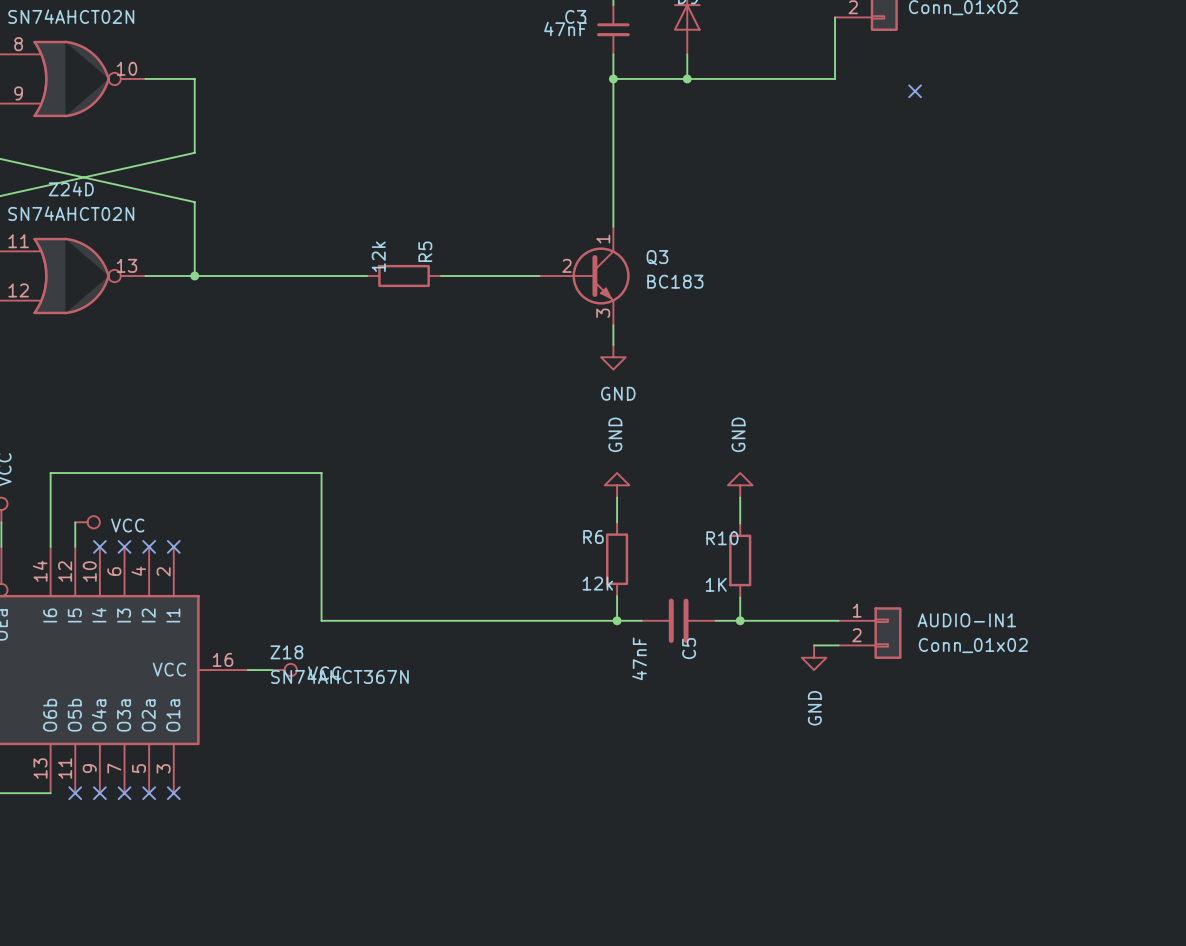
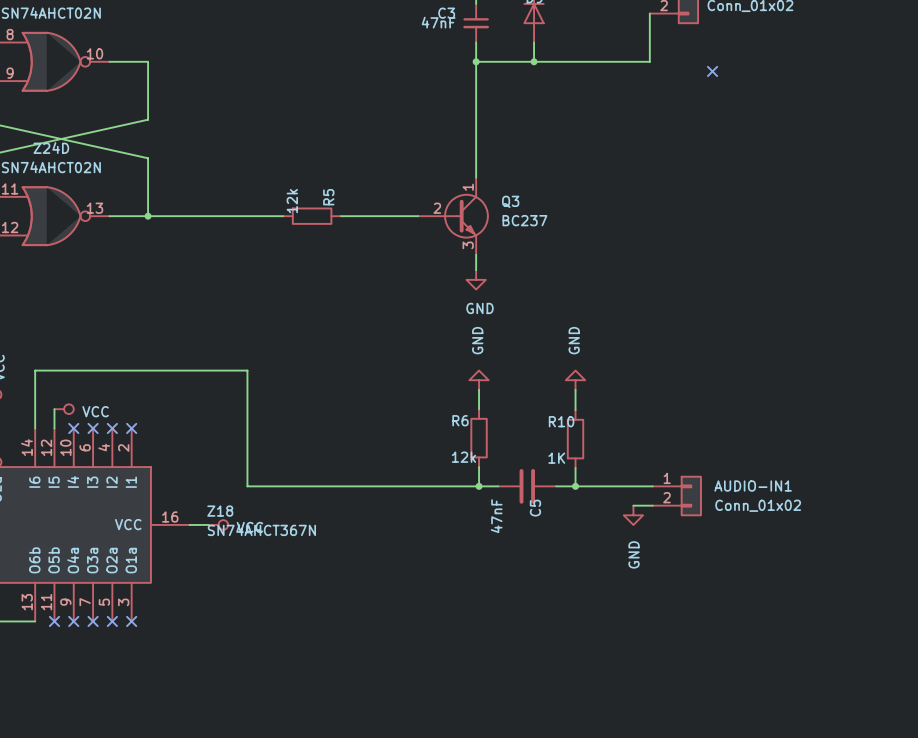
Q3 symbol: [539, 226, 630, 326] -> [418, 177, 489, 255]
Q3 value: BC183 (675, 281) -> BC237 (524, 220)

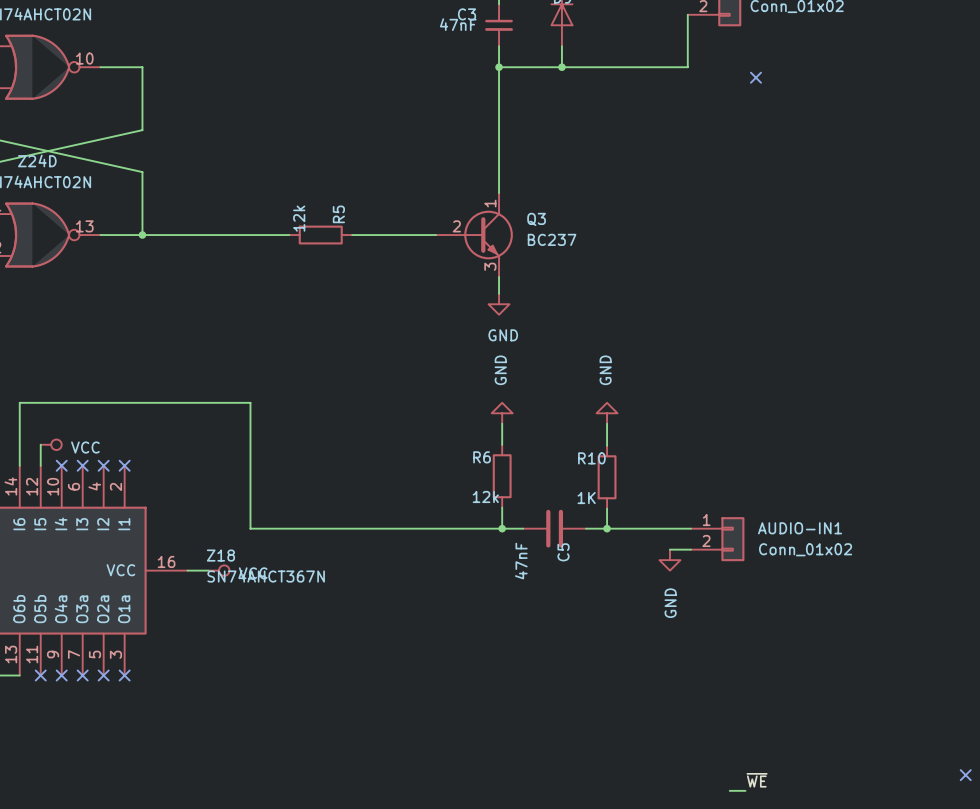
no-connect mark: none -> (965, 775)
label: none -> ~{WE} (757, 780)
wire: none -> (729, 790) (745, 790)

